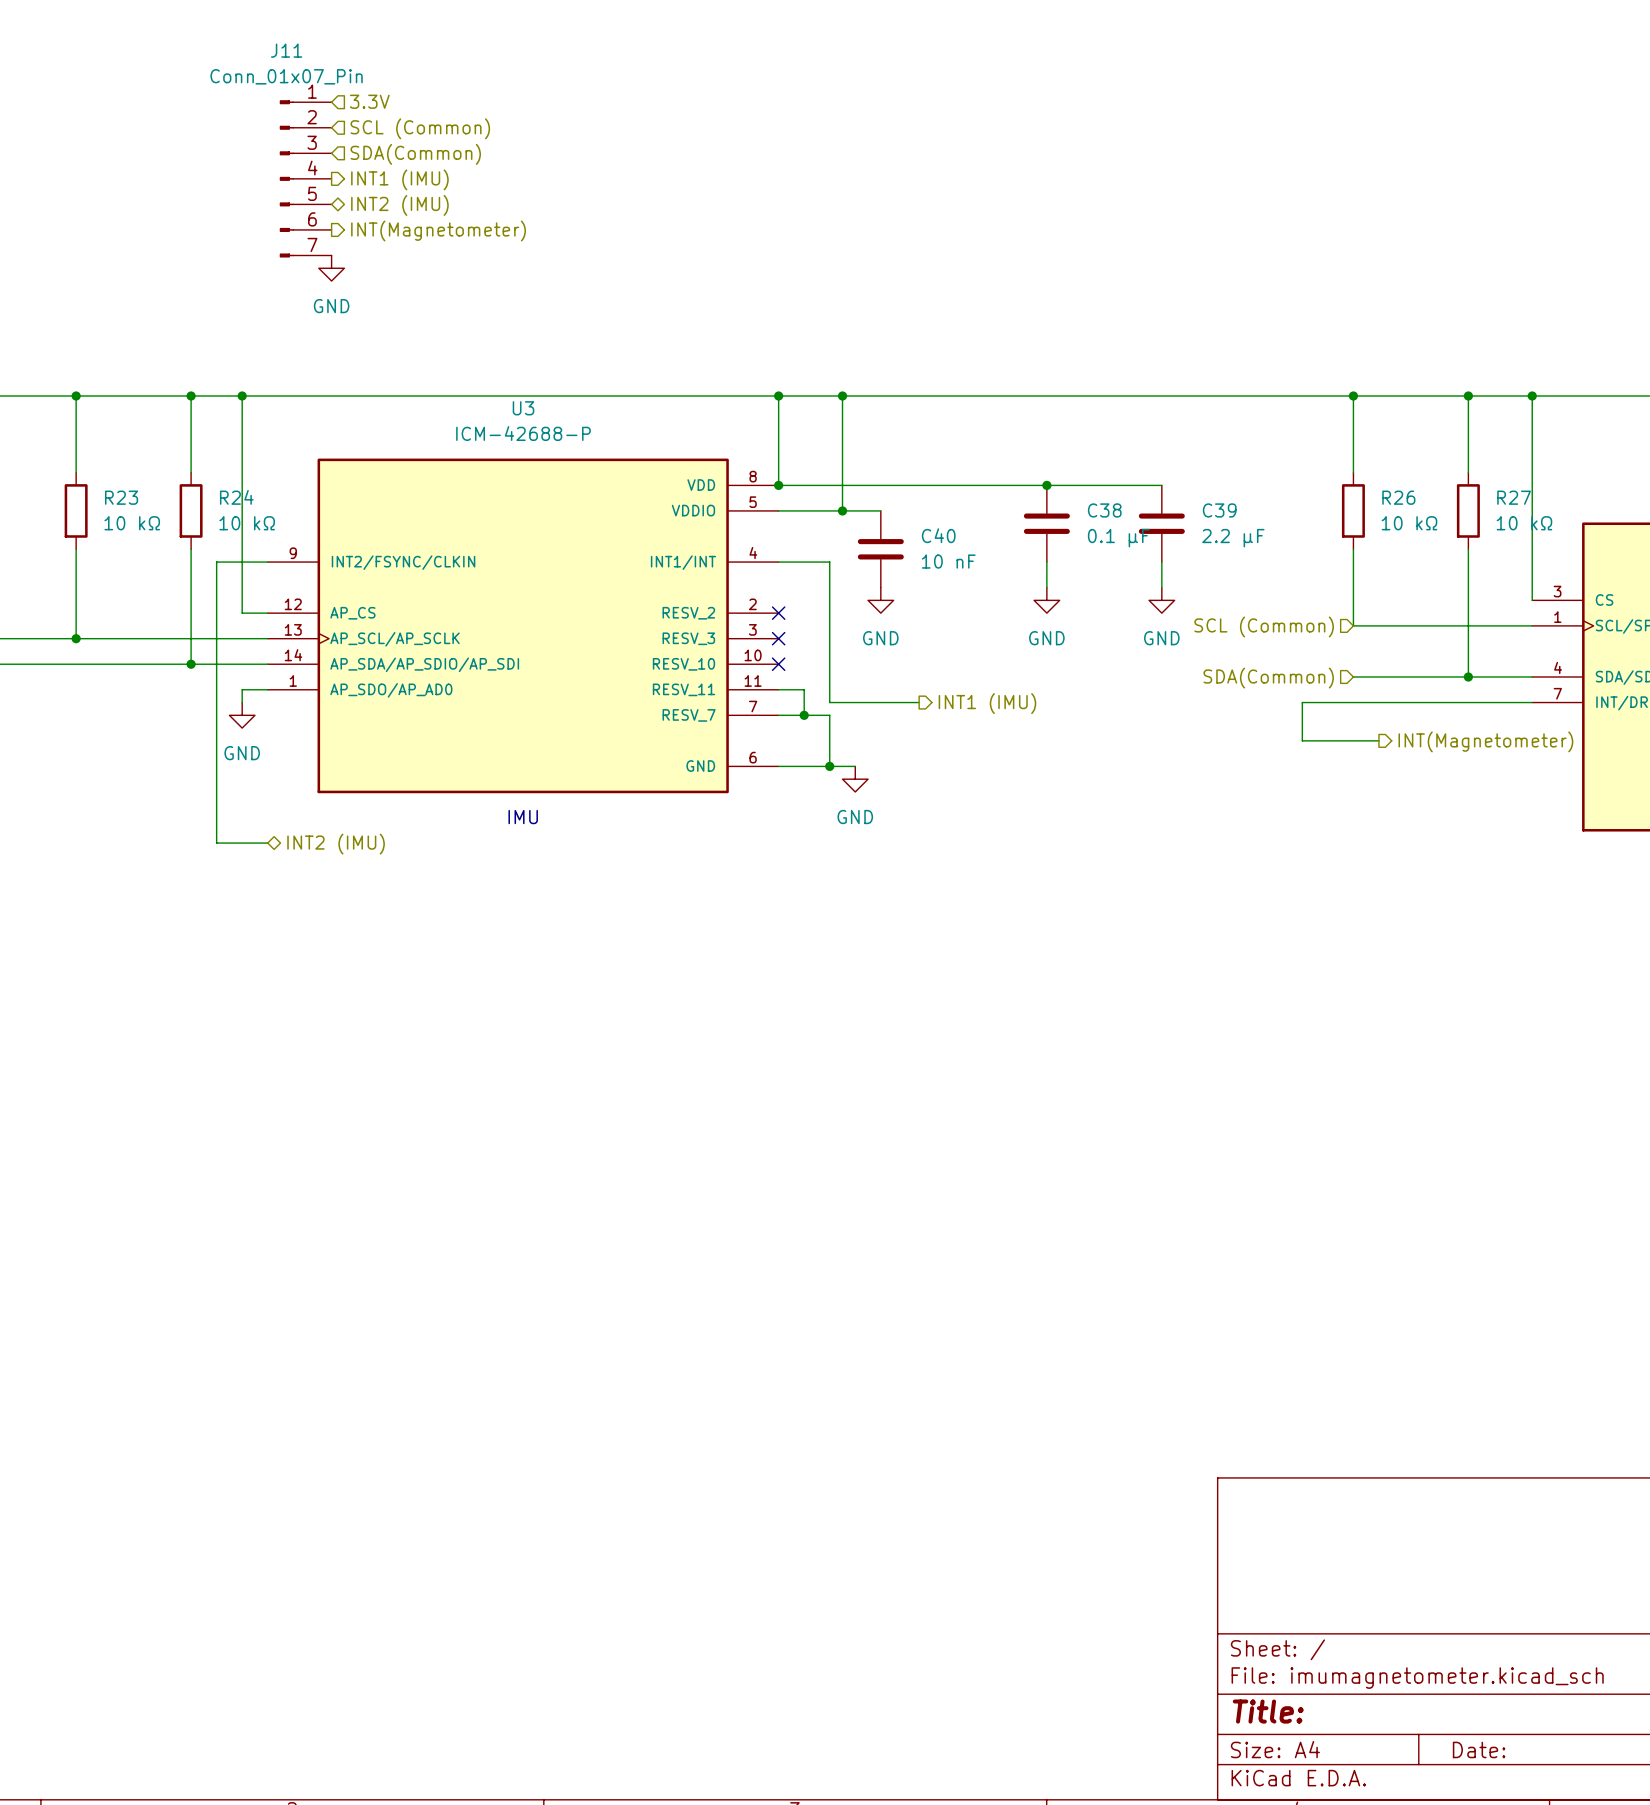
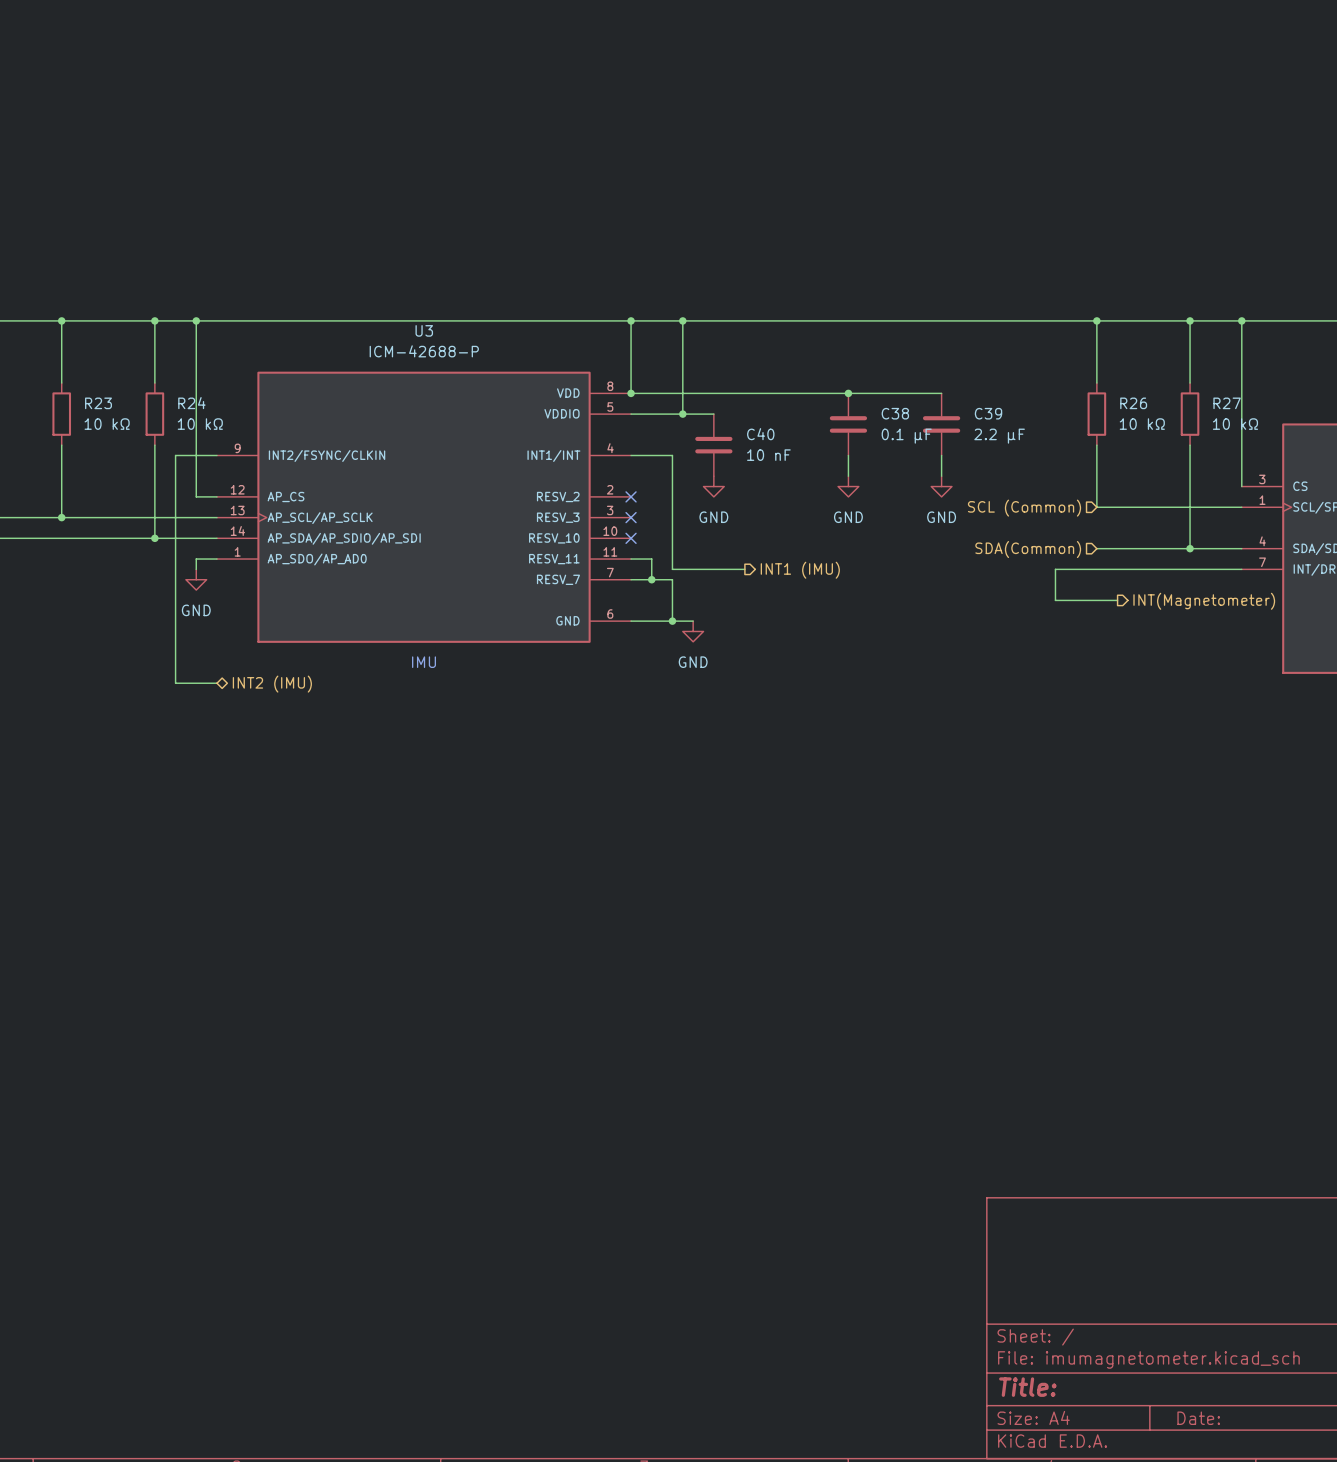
hierarchical label: 3.3V (369, 101) -> none
hierarchical label: SCL (Common) (420, 128) -> none
hierarchical label: SDA(Common) (415, 154) -> none
J11: Conn_01x07_Pin (305, 178) -> none
hierarchical label: INT1 (IMU) (399, 179) -> none
hierarchical label: INT2 (IMU) (399, 205) -> none
hierarchical label: INT(Magnetometer) (438, 230) -> none
power symbol: GND (331, 268) -> none

